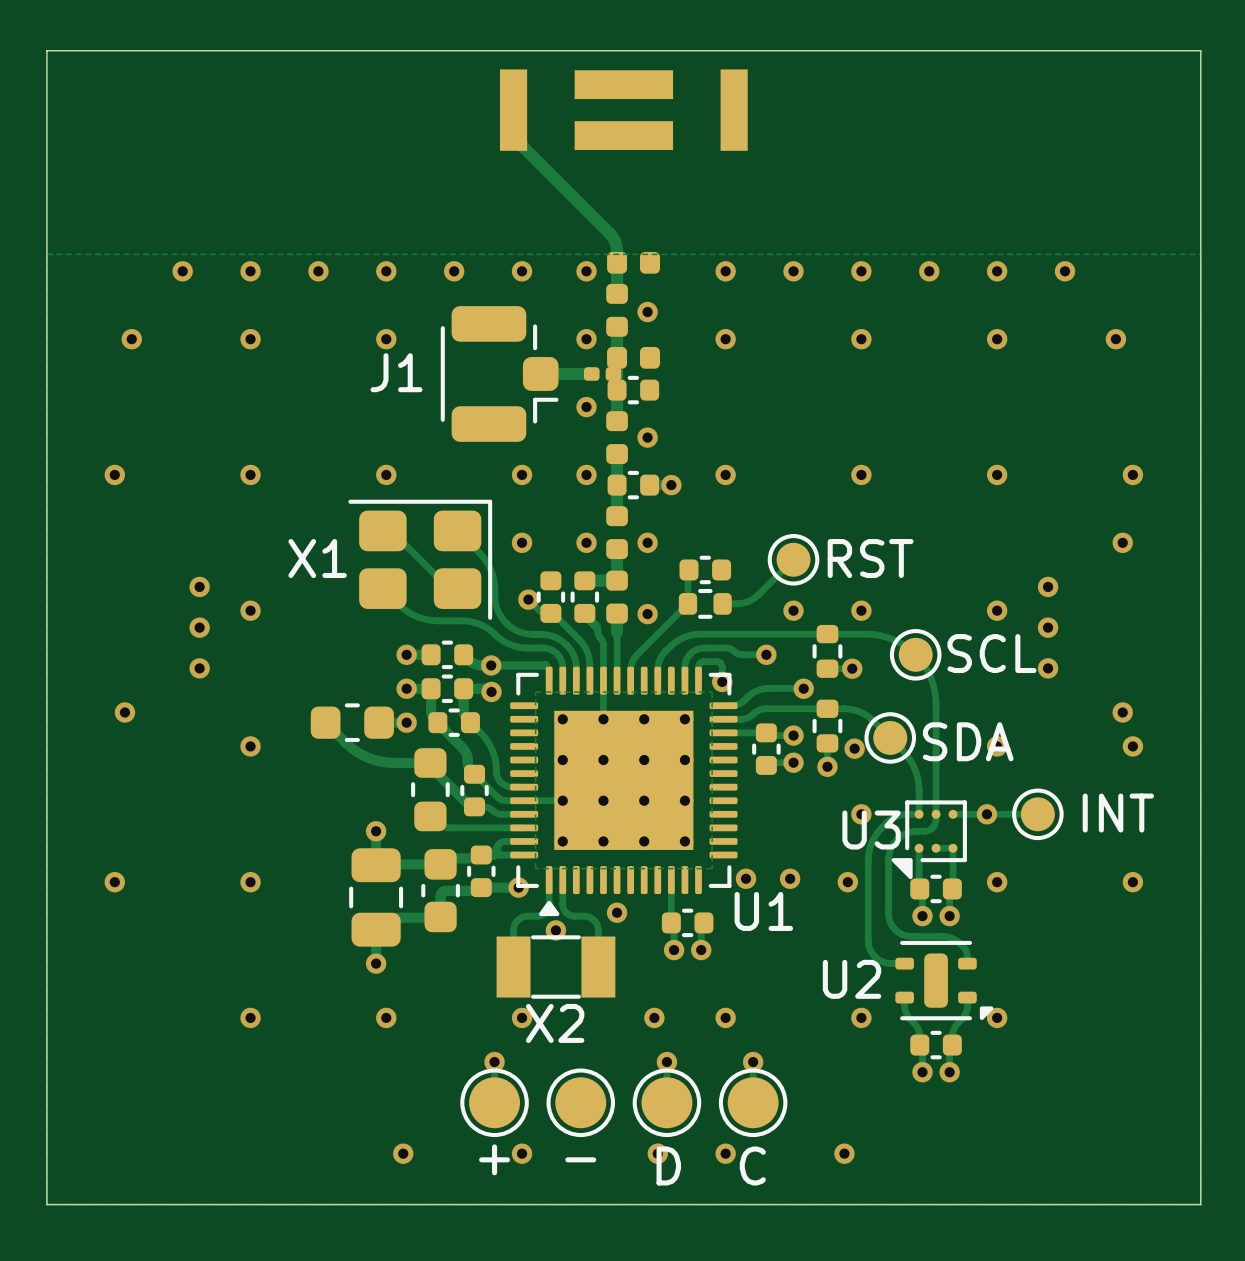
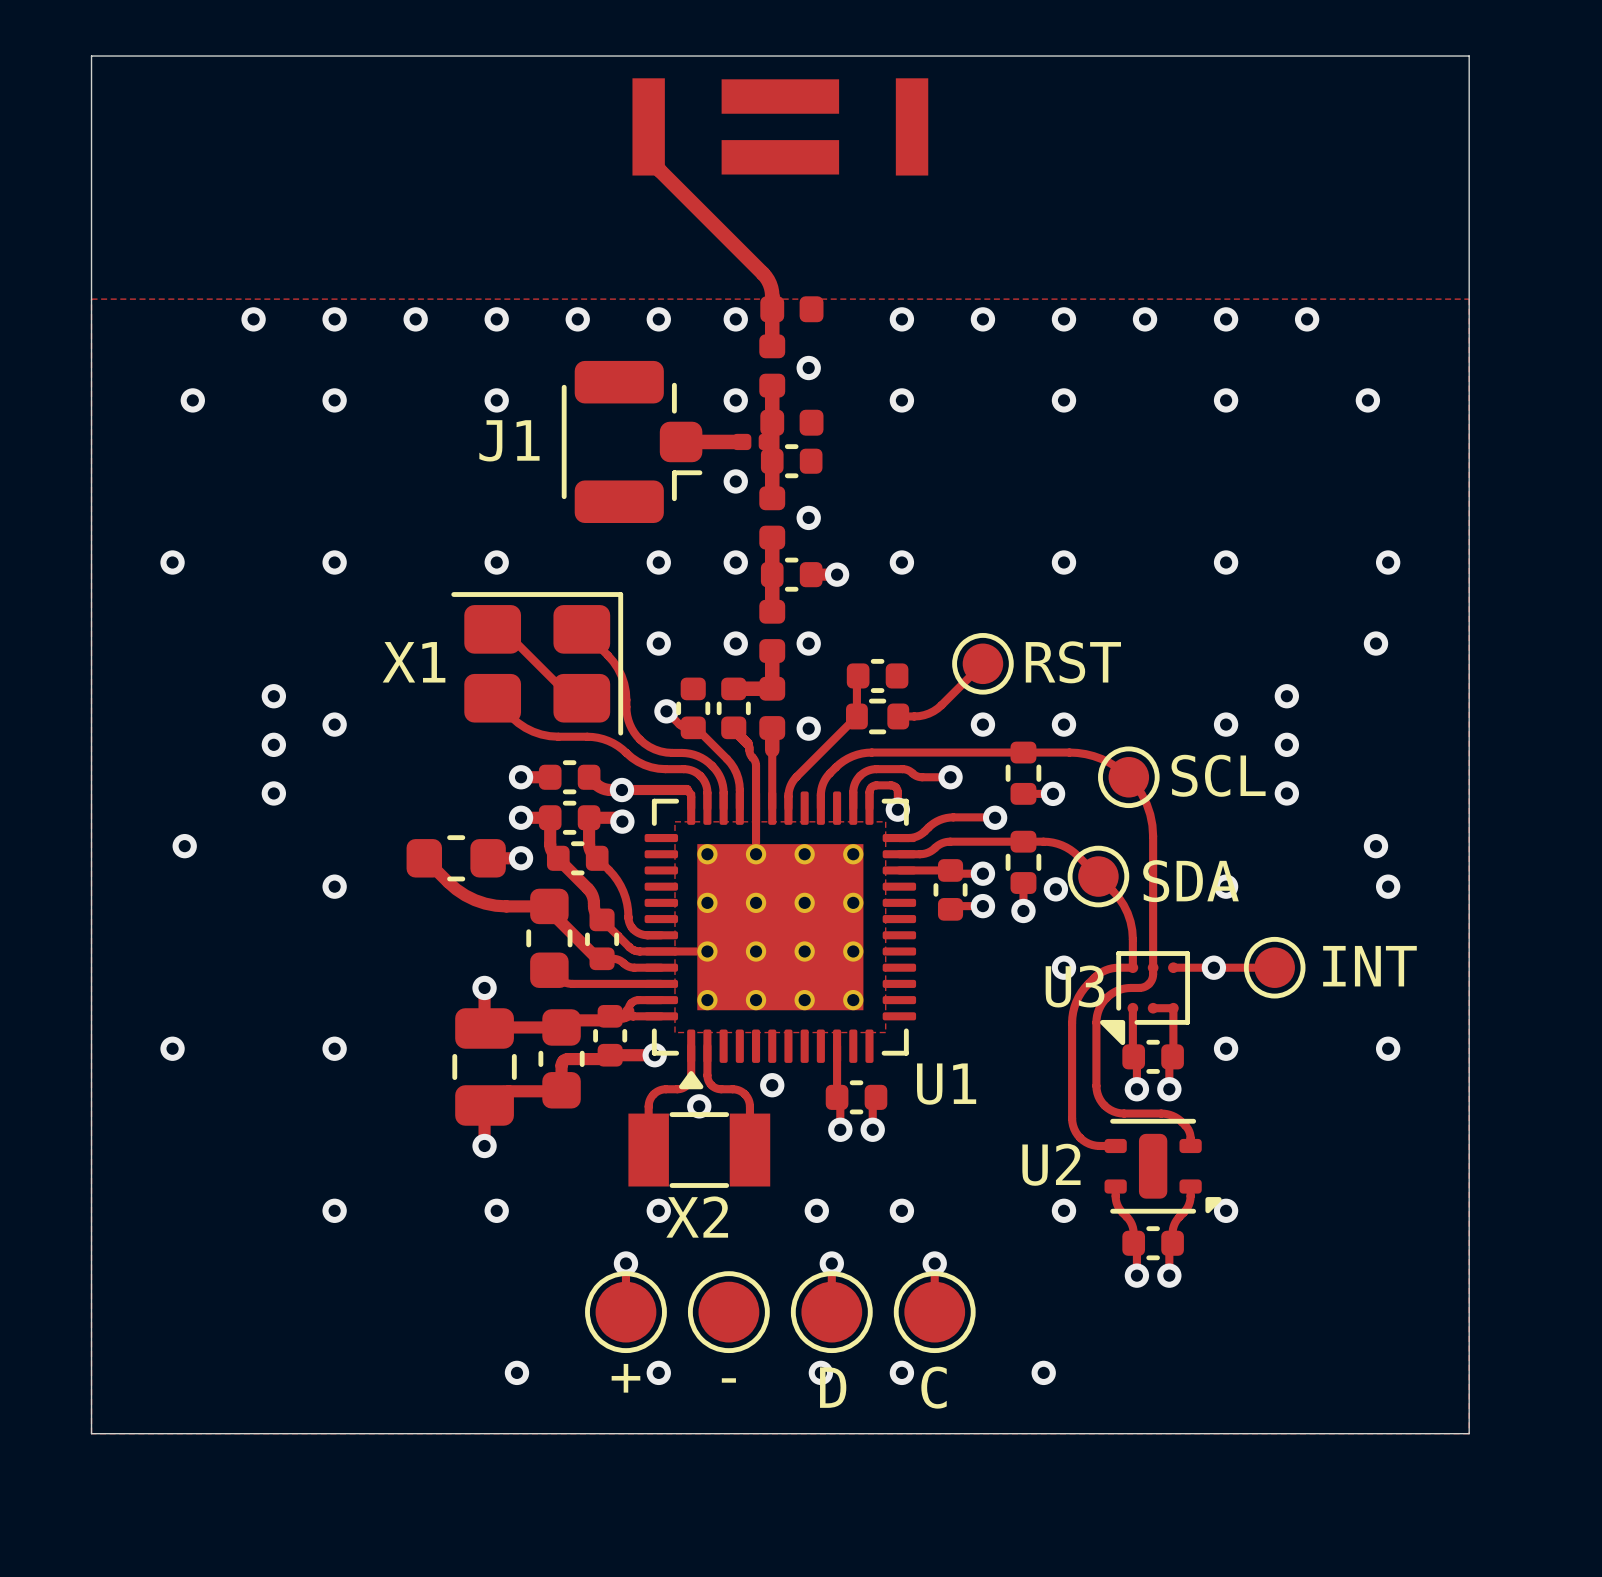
via: (746, 878) -> none
via: (790, 878) -> none
via: (847, 882) -> none

